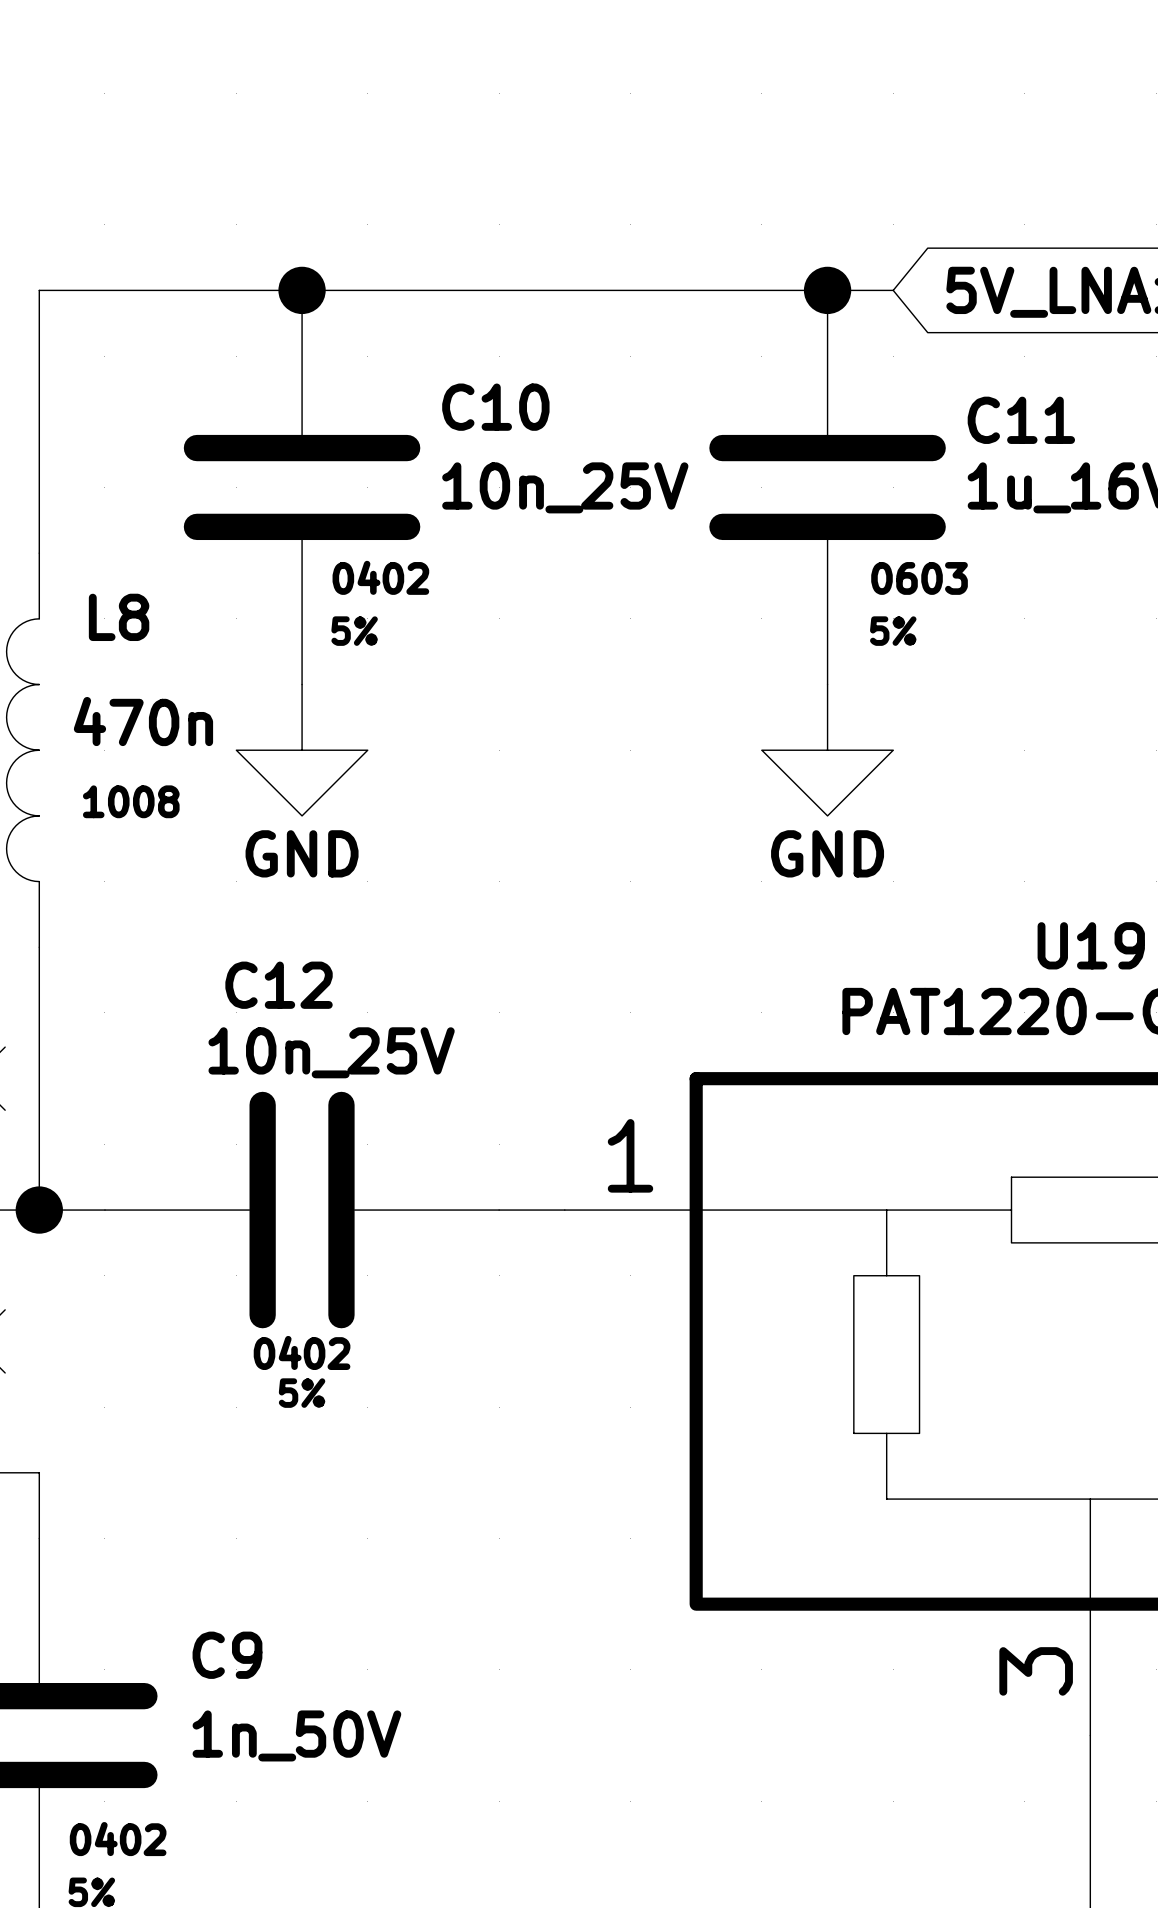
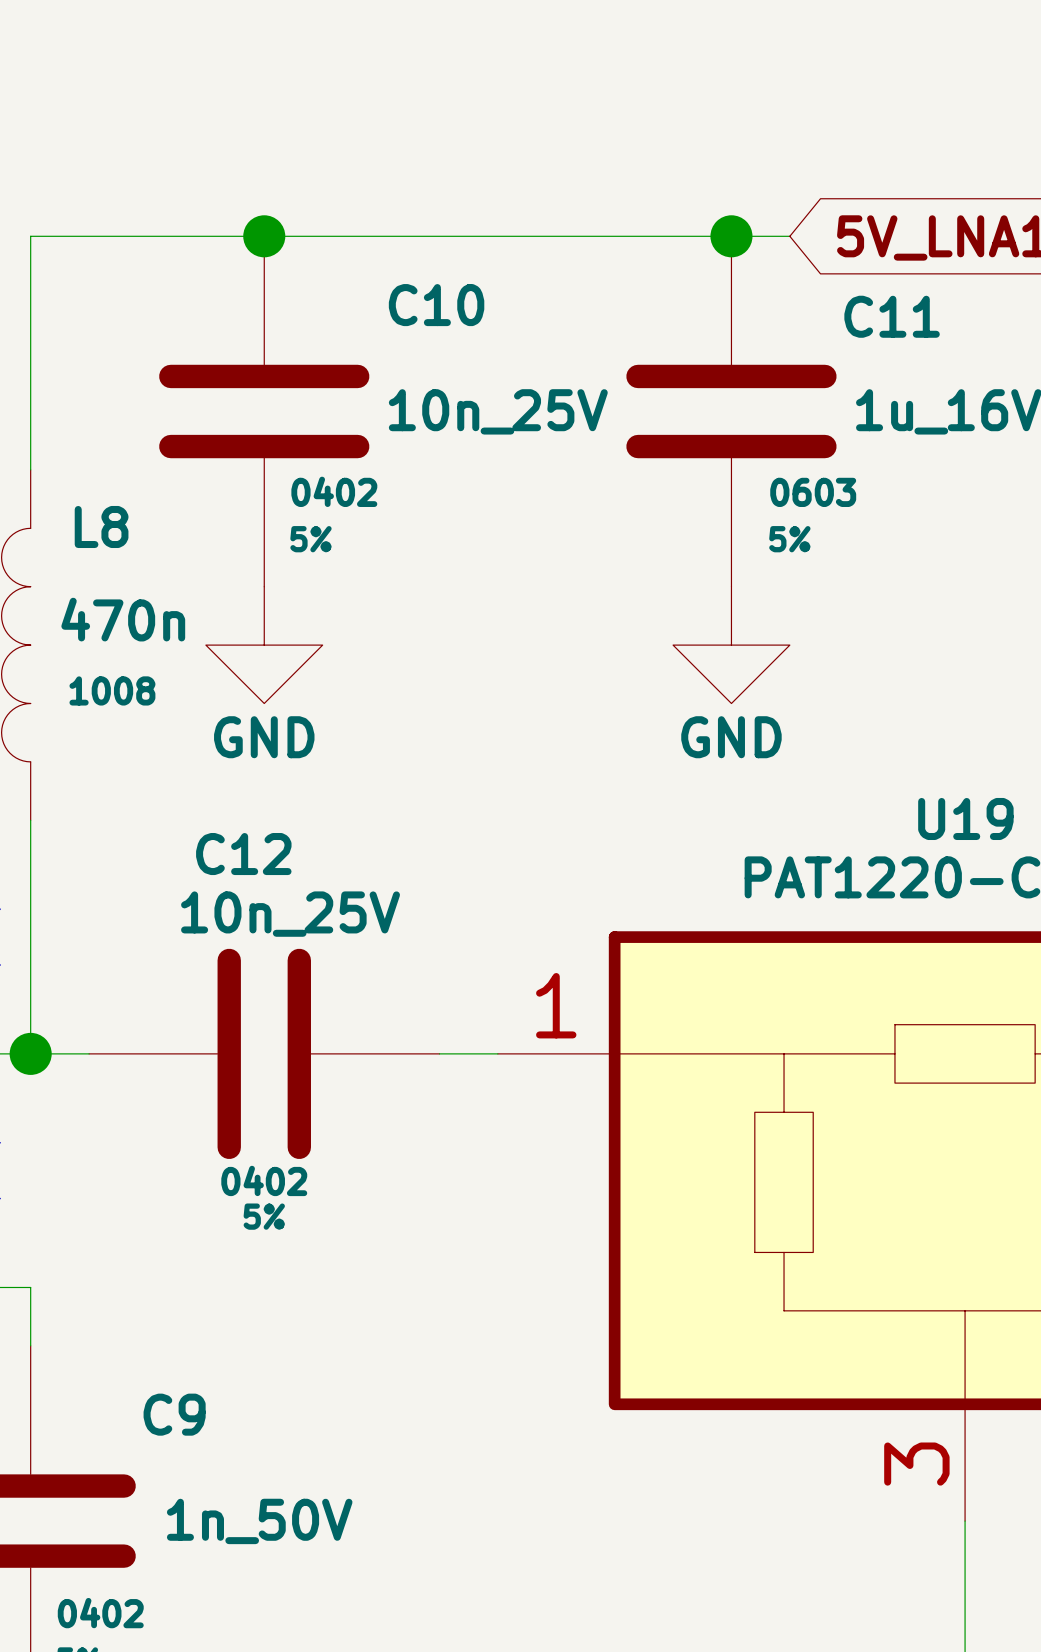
C10 name position: C10 (495, 407) -> C10 (436, 305)
C11 name position: C11 (1021, 420) -> C11 (892, 316)
C9 name position: C9 (227, 1655) -> C9 (174, 1414)

